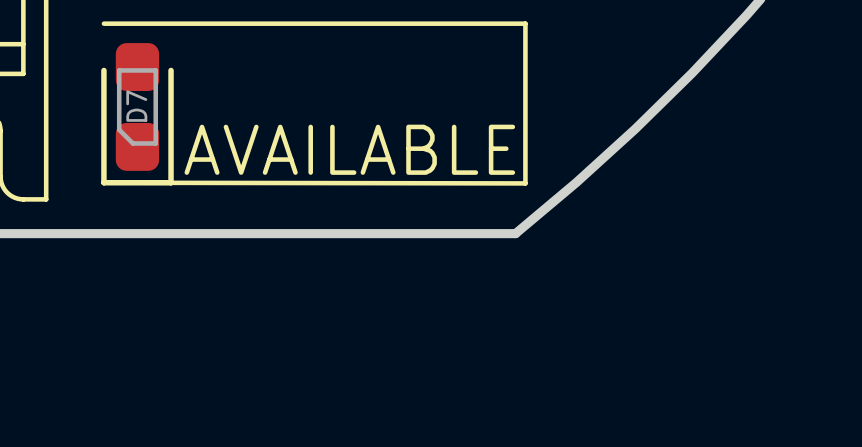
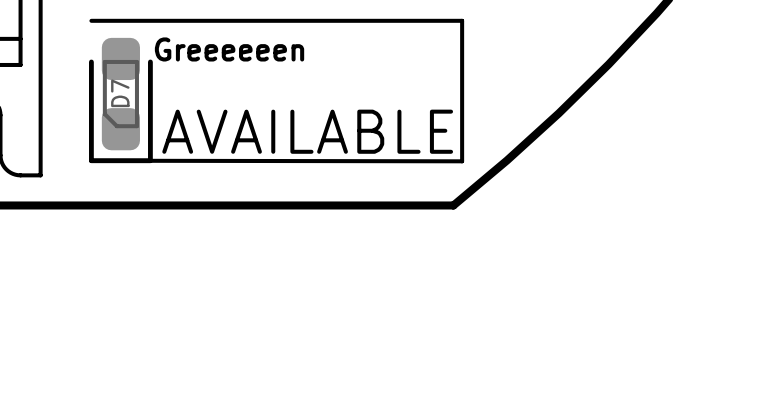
text: none -> Greeeeeen (229, 49)

